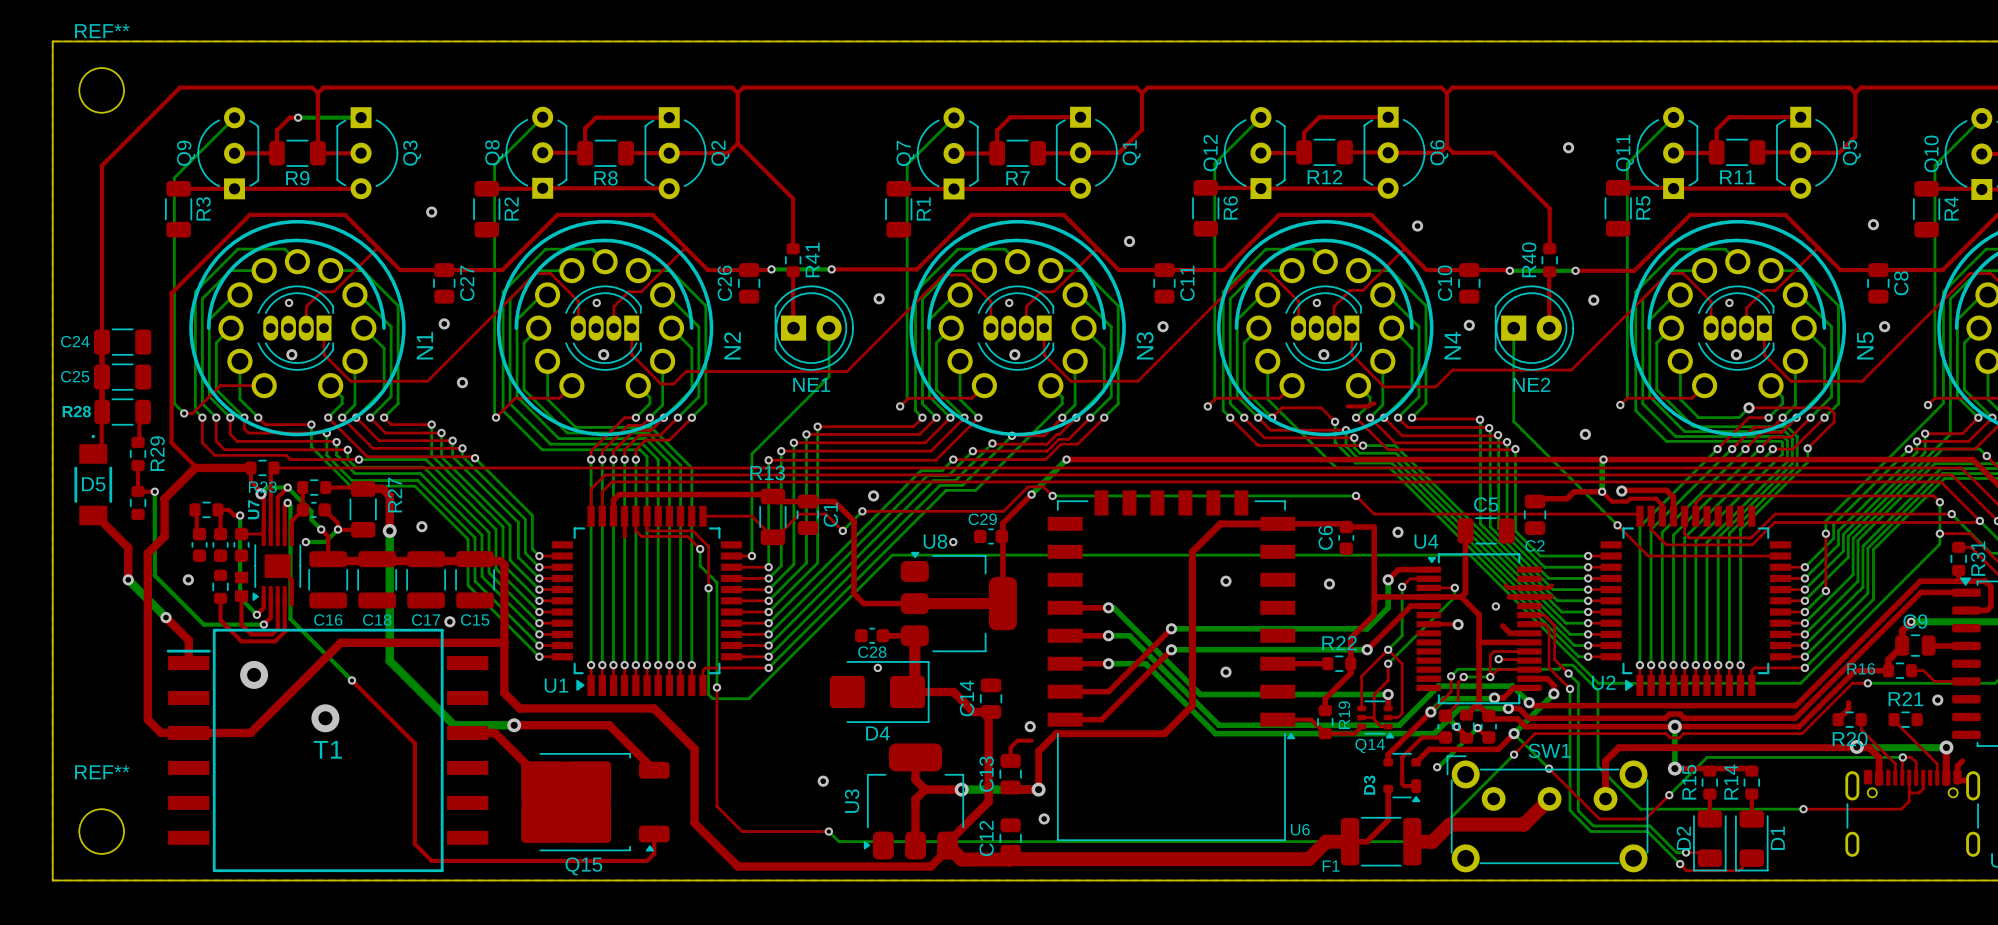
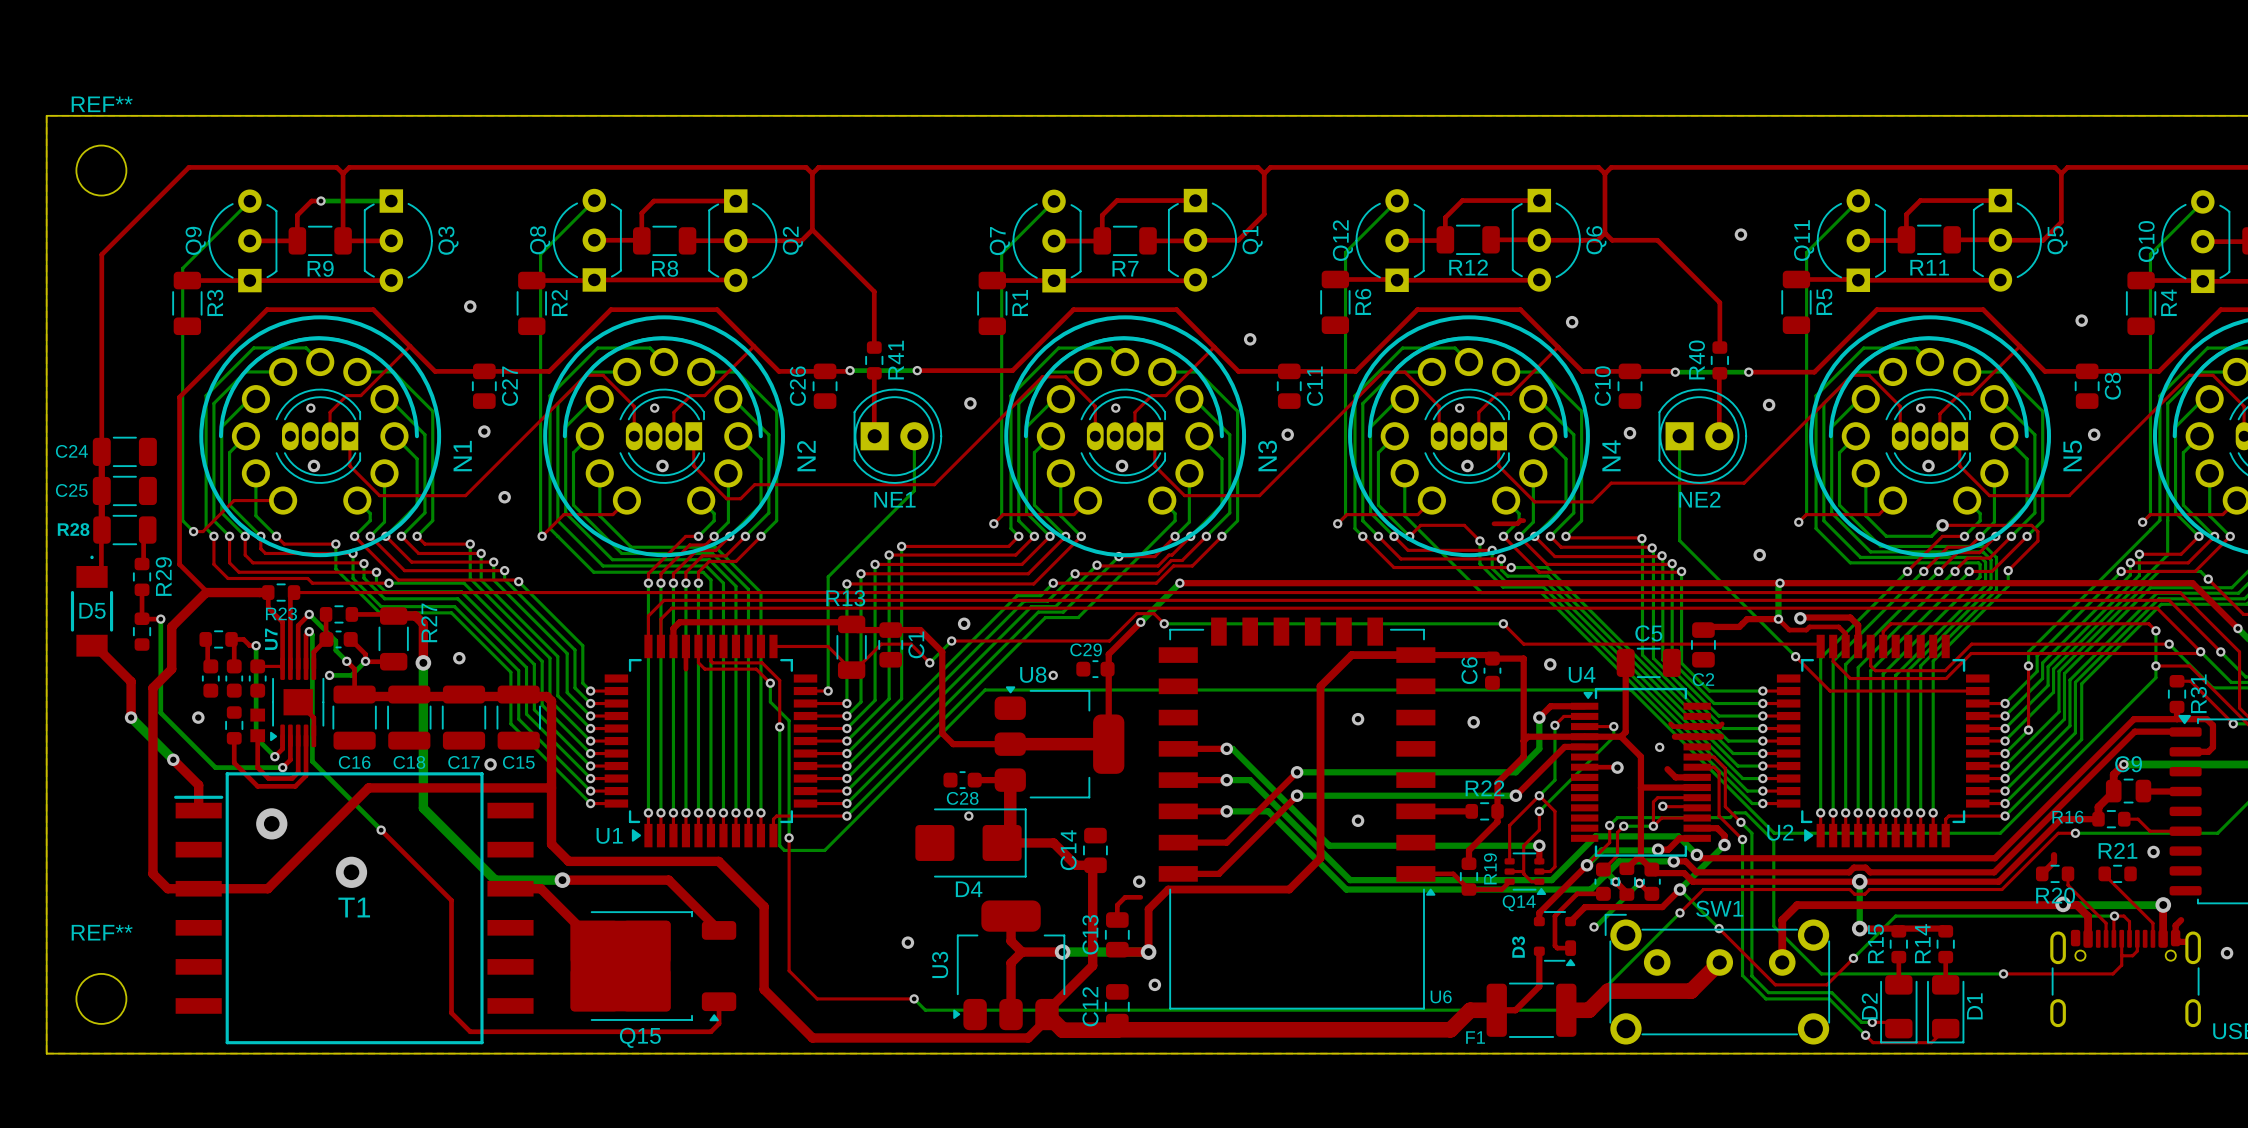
bottom track: (287, 487) (267, 487) (260, 493) -> none
via: (260, 493) -> none

